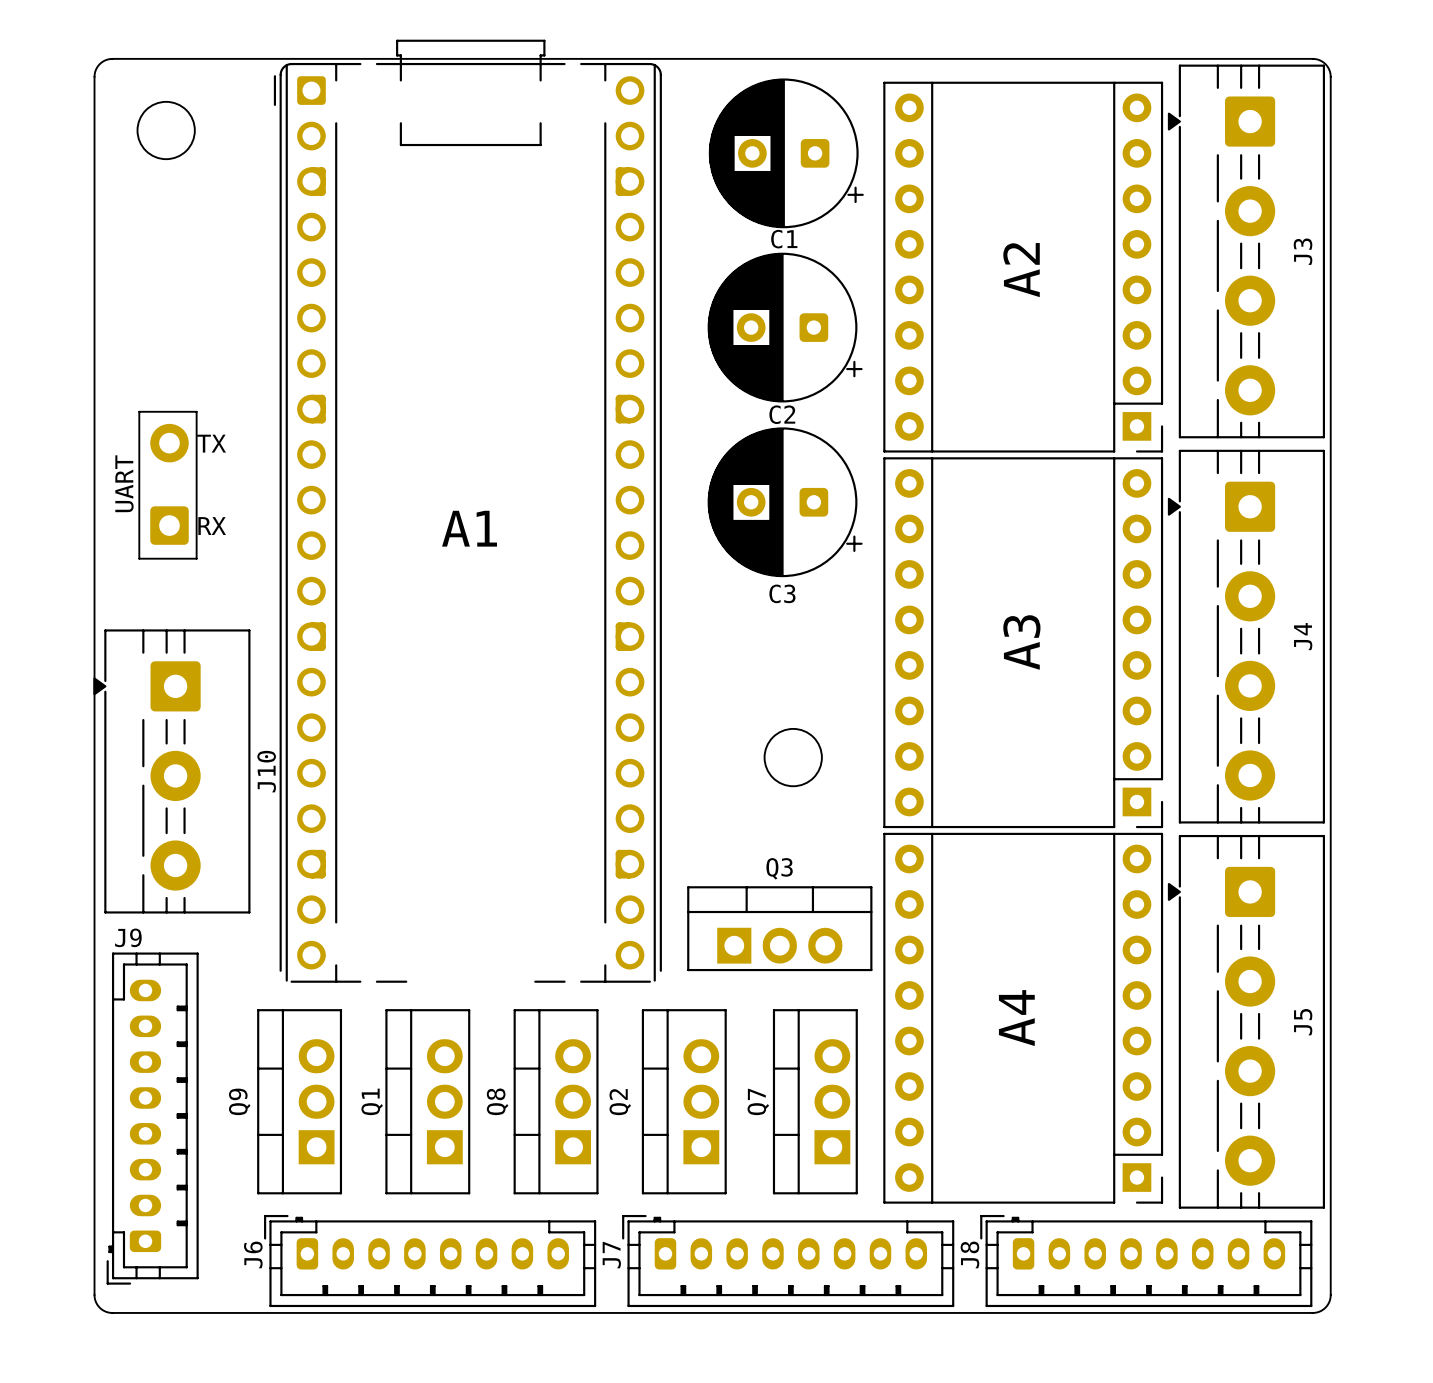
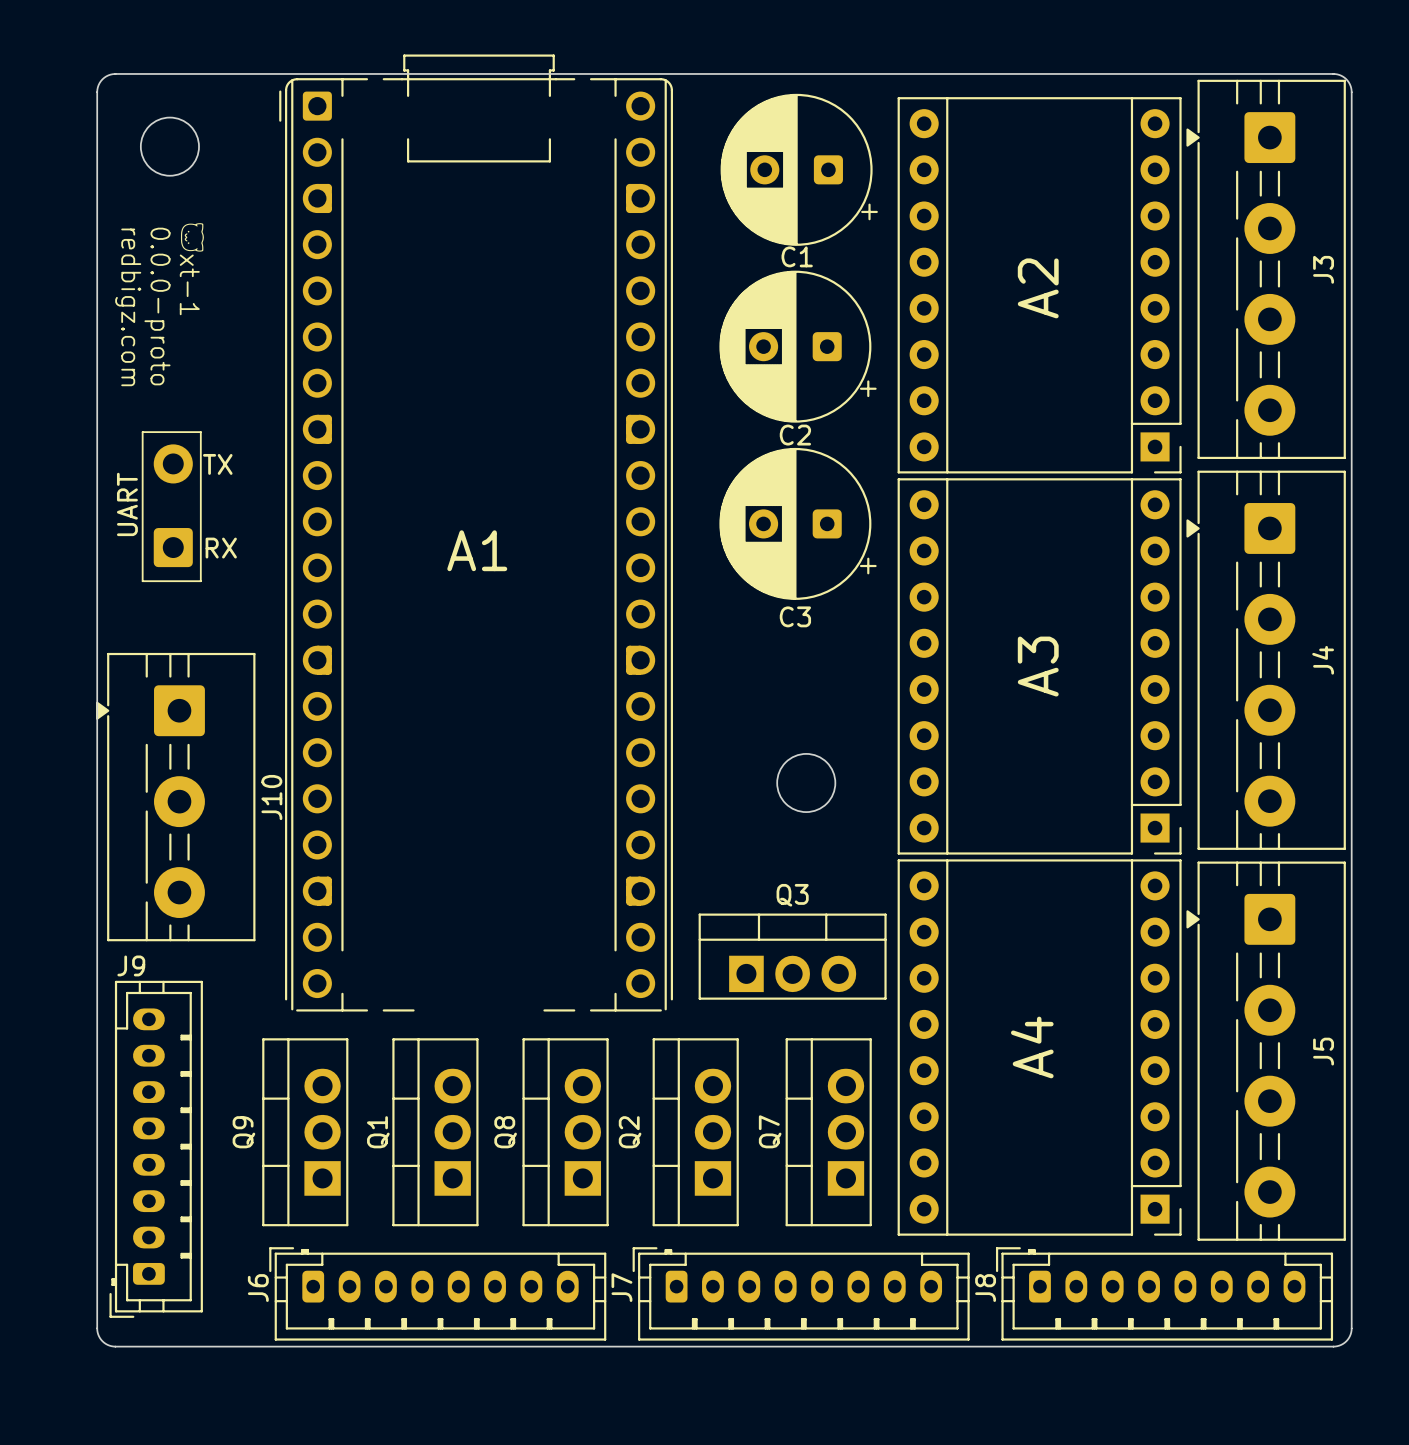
drawing: none -> [180, 223, 204, 252]
text: none -> xt-1 (189, 284)
text: none -> 0.0.0-proto (157, 306)
text: none -> redbigz.com (128, 307)

